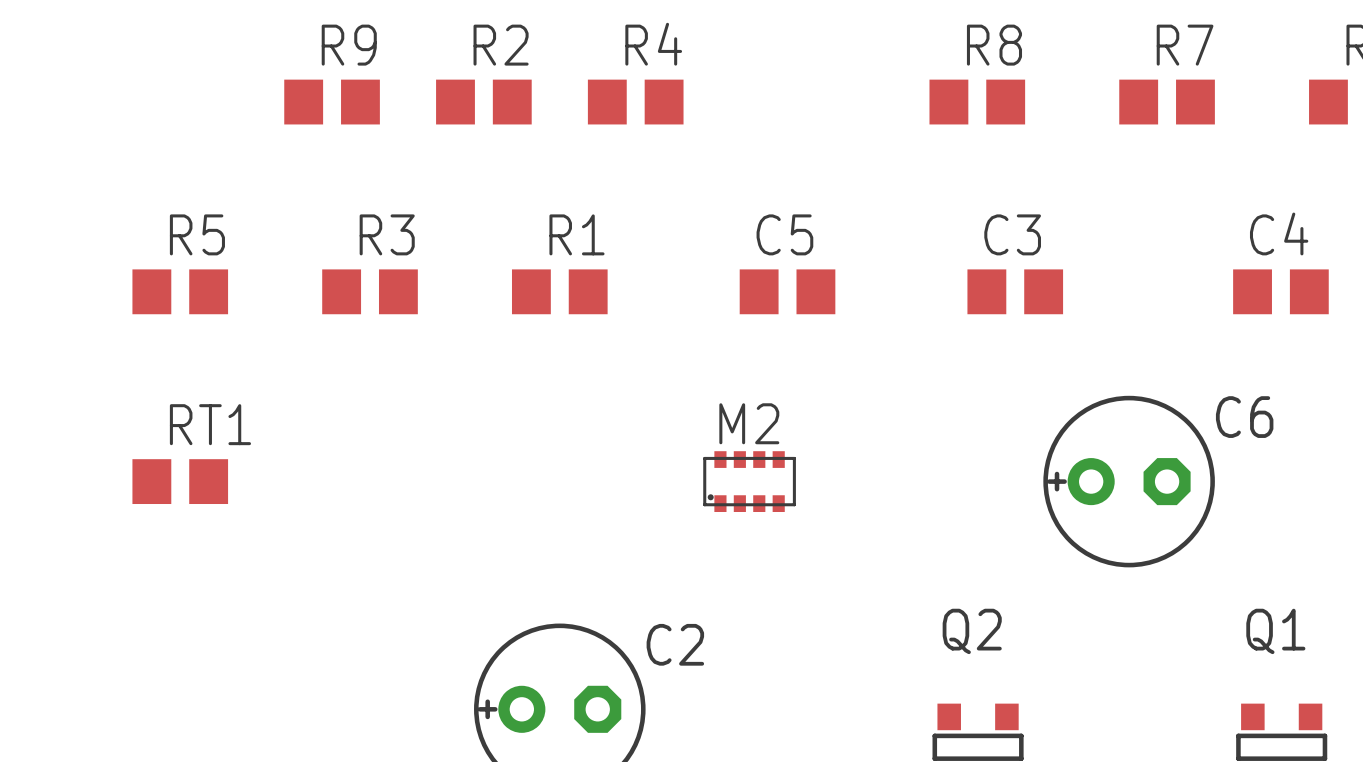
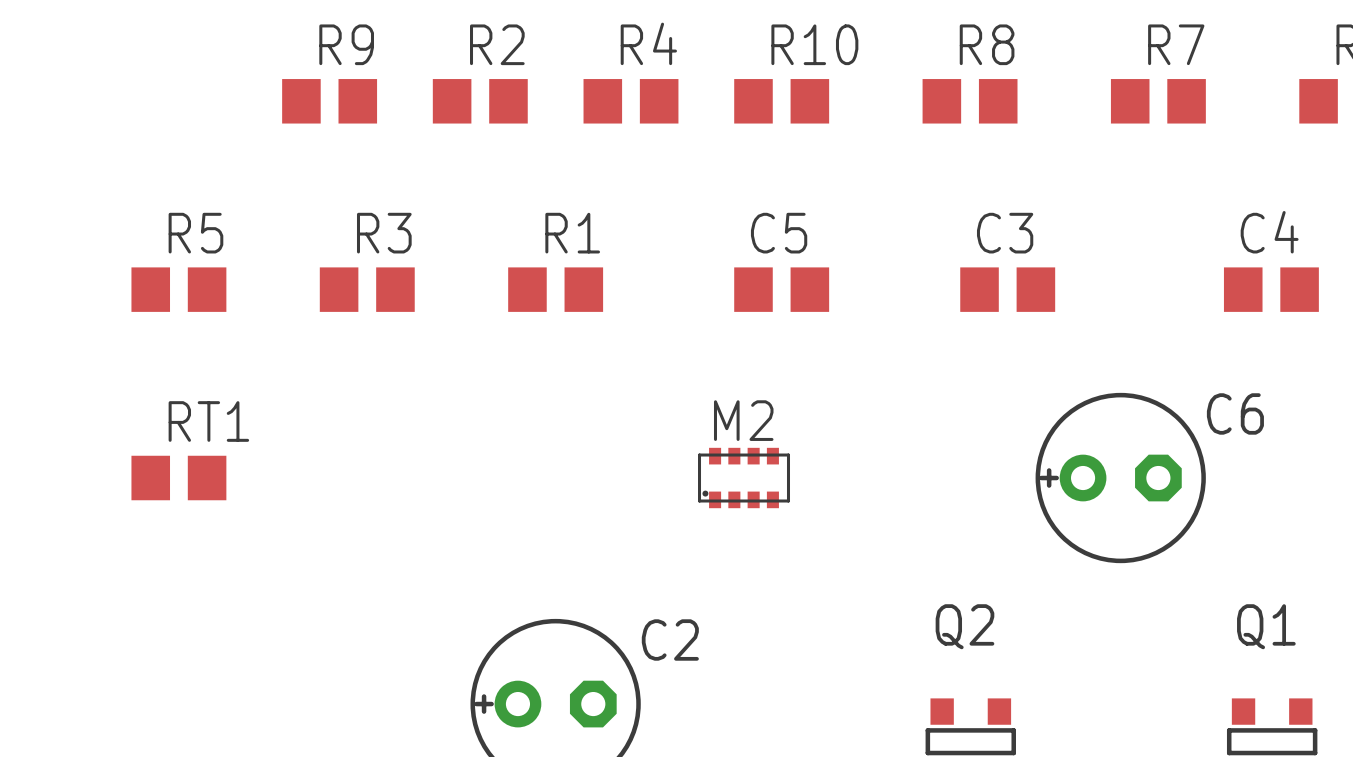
R10: none -> (781, 101)

